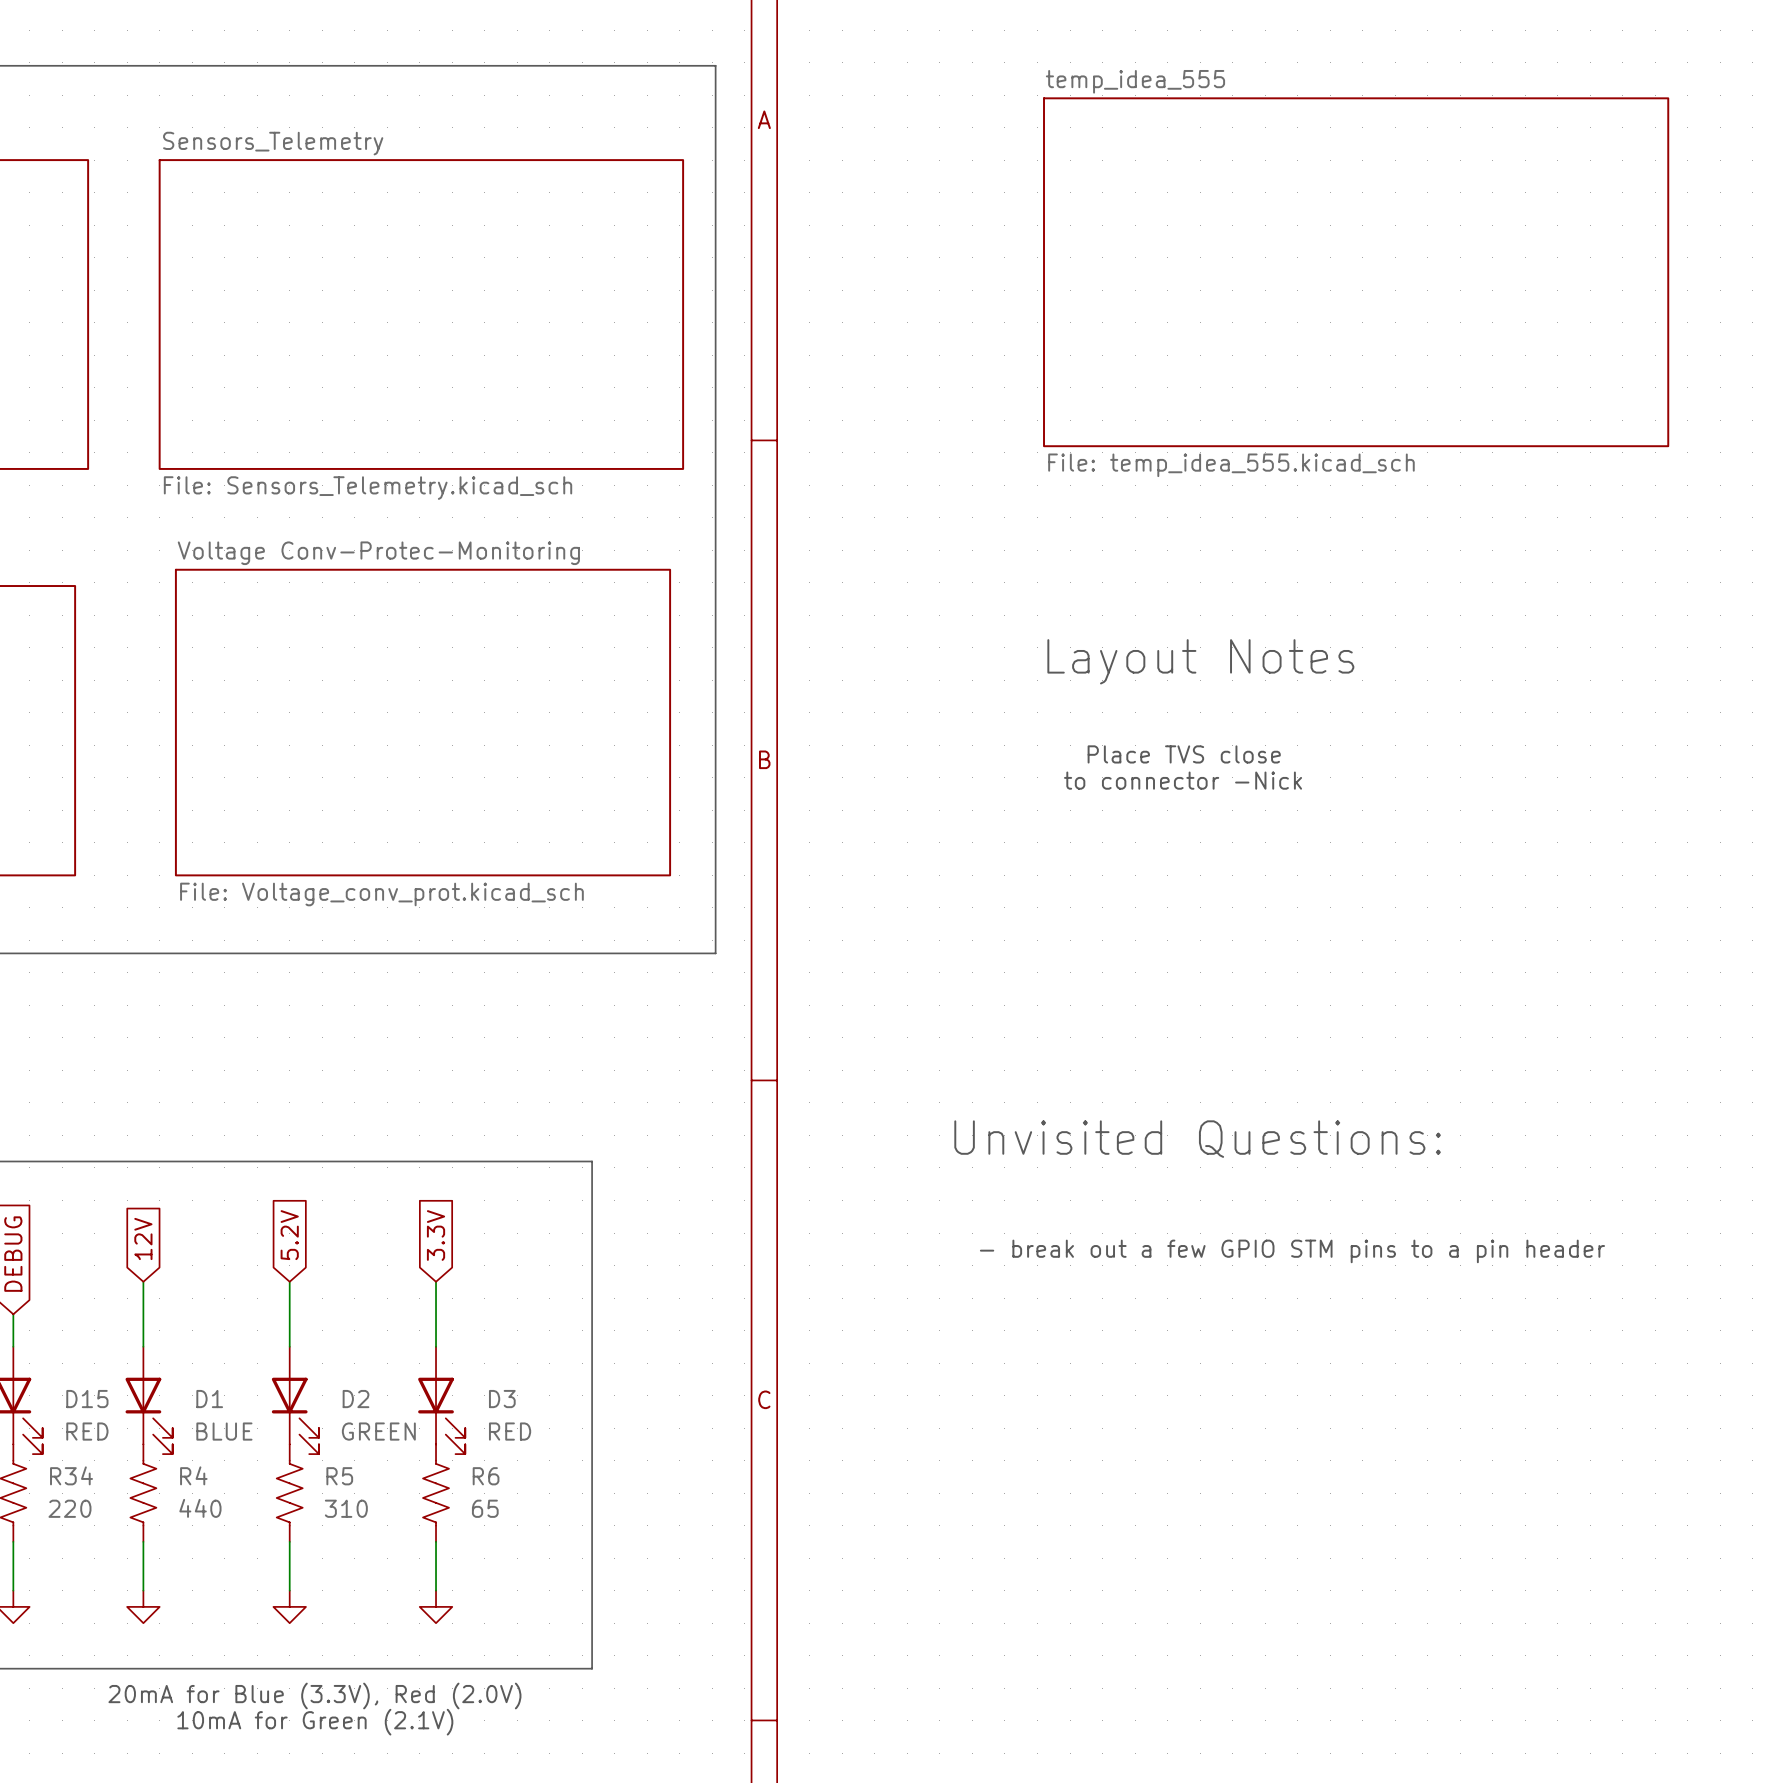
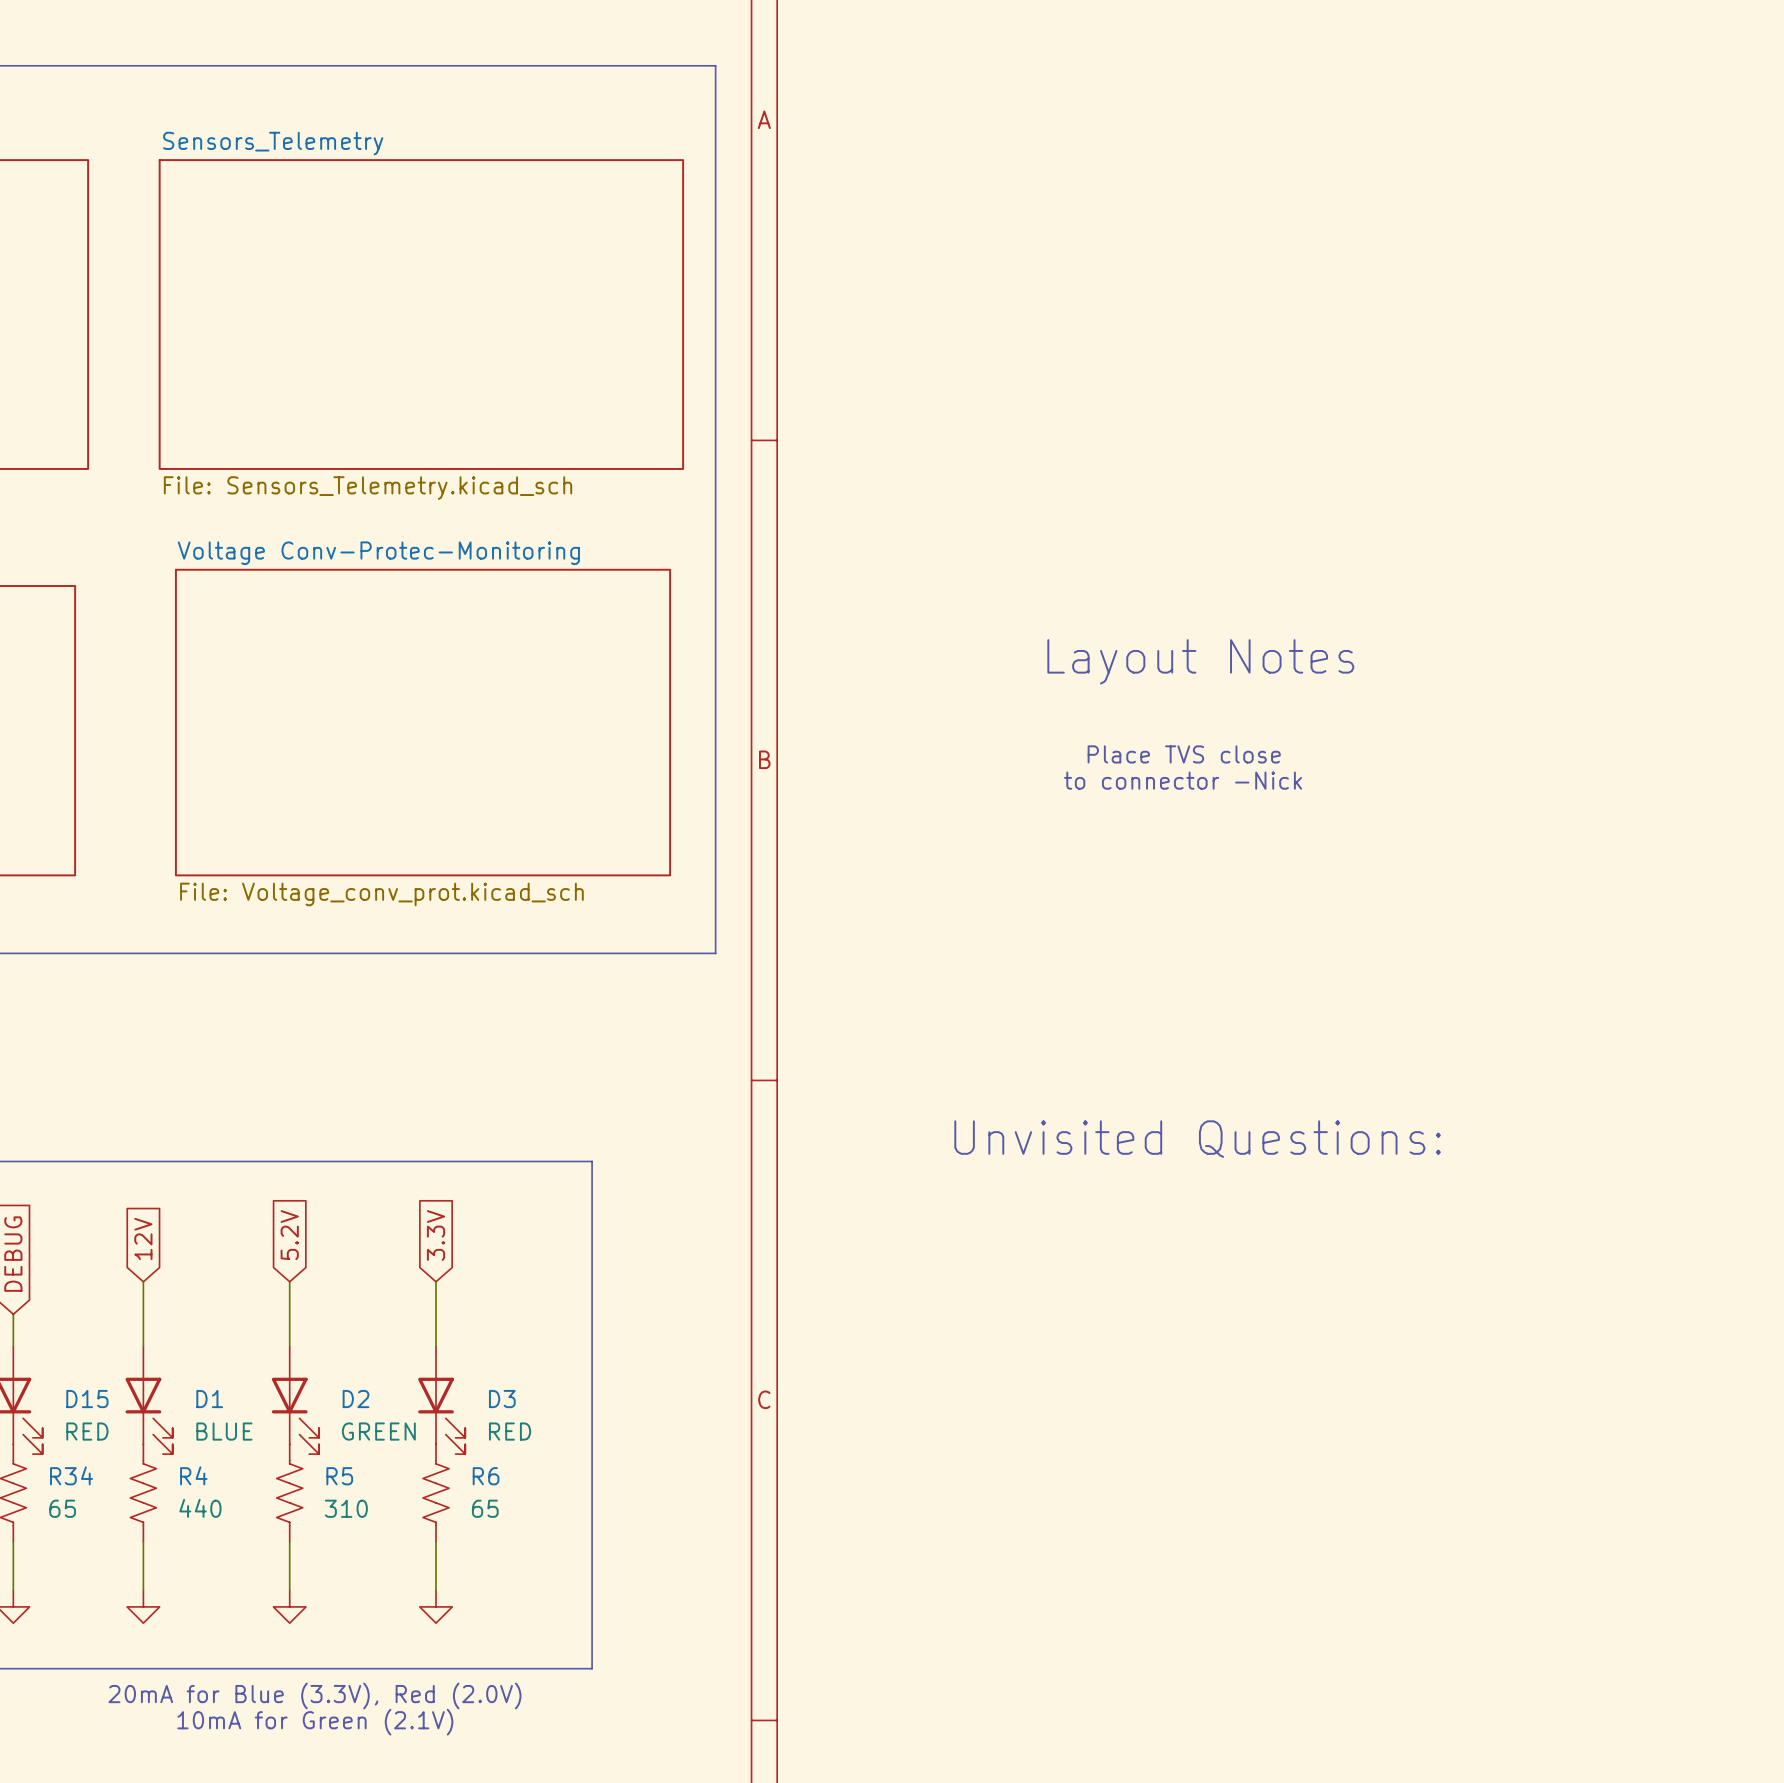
sheet temp_idea_555: File: temp_idea_555.kicad_sch (1356, 272) -> none
text: - break out a few GPIO STM pins to a pin header (1292, 1251) -> none
R34 value: 220 (69, 1508) -> 65 (62, 1508)

